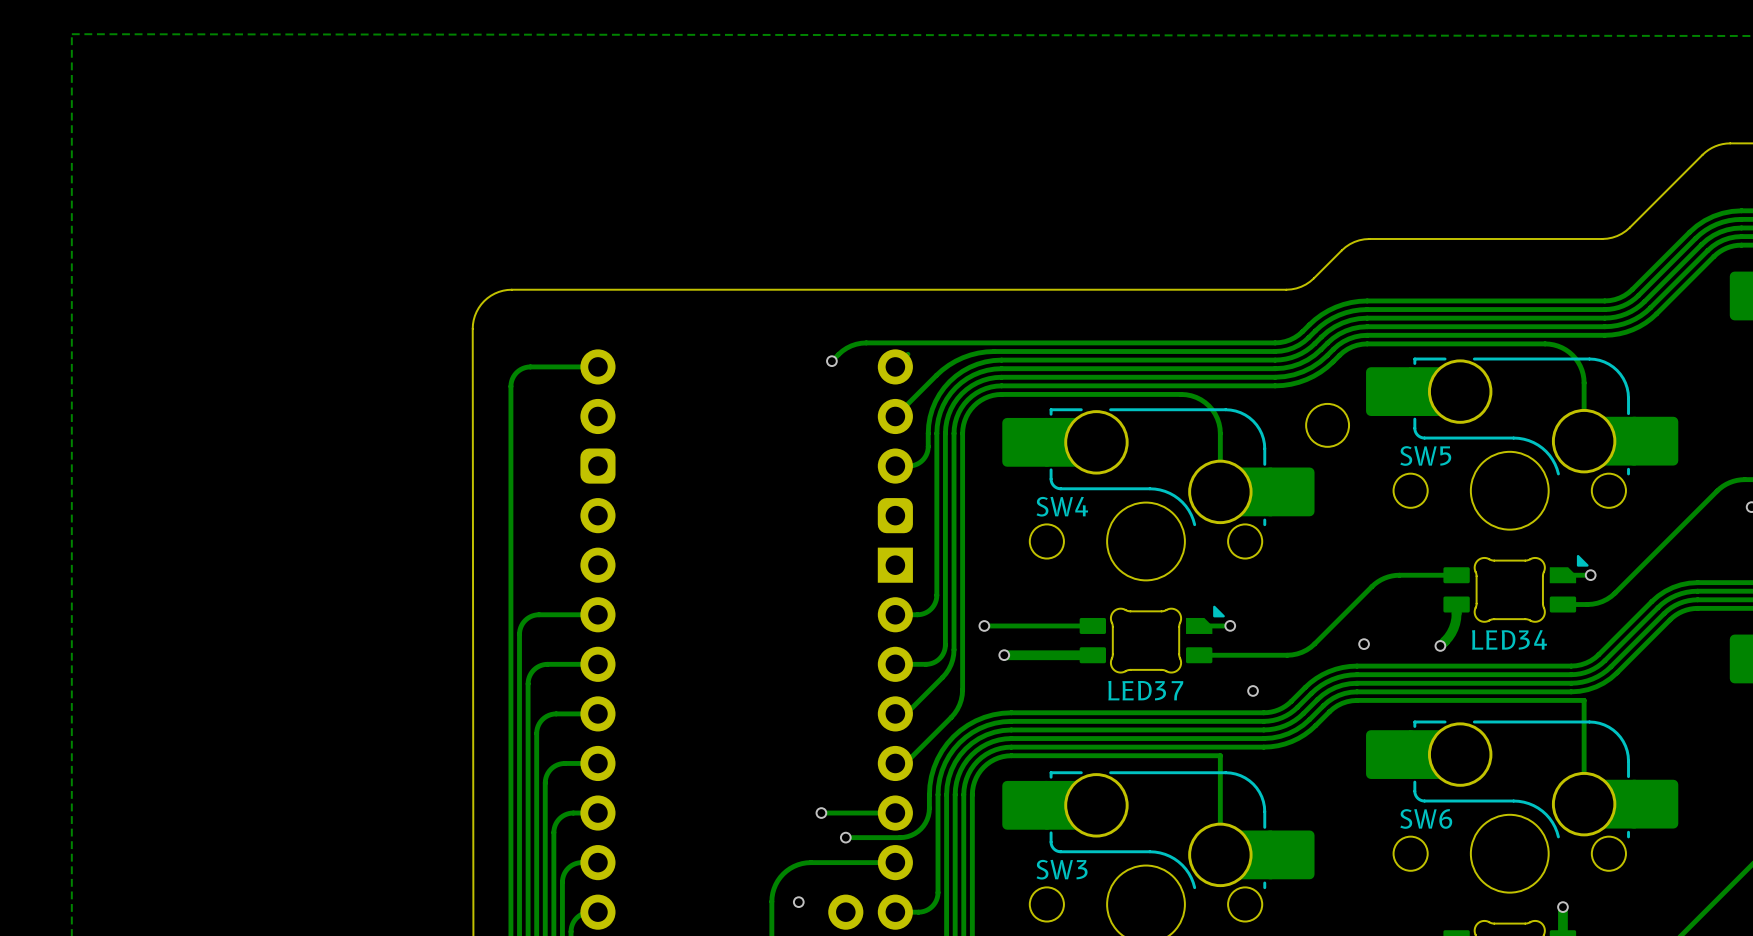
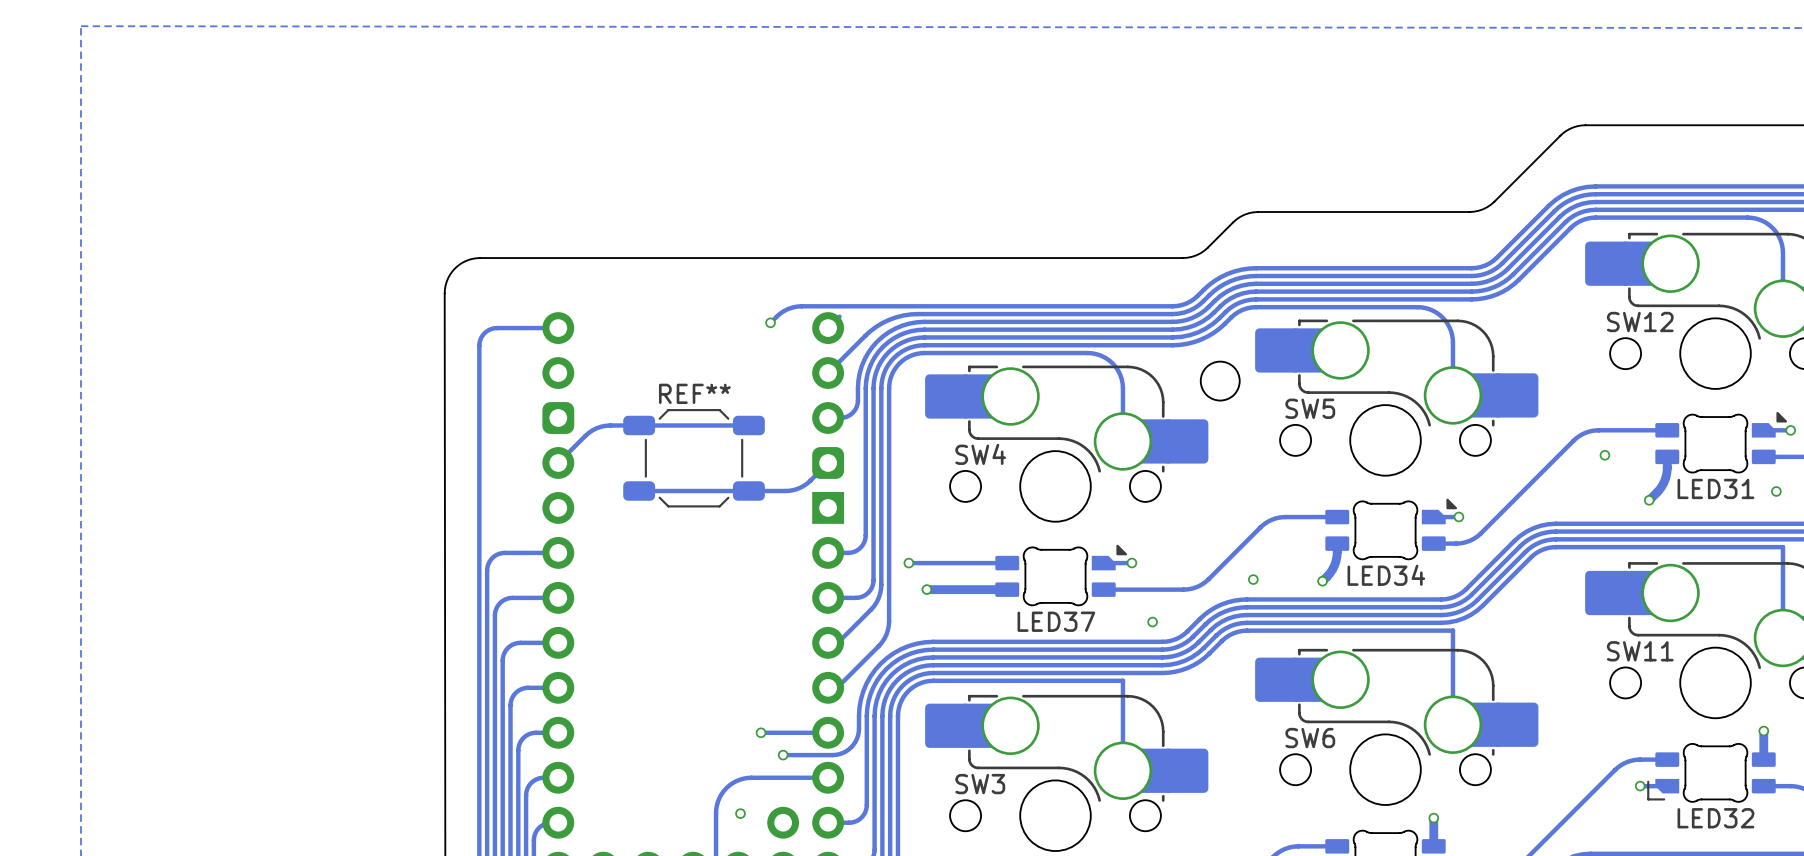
track: none -> (748, 425) (605, 425) (588, 432) (558, 462)
REF**: none -> (694, 458)
track: none -> (828, 462) (805, 485) (788, 490) (639, 491)

